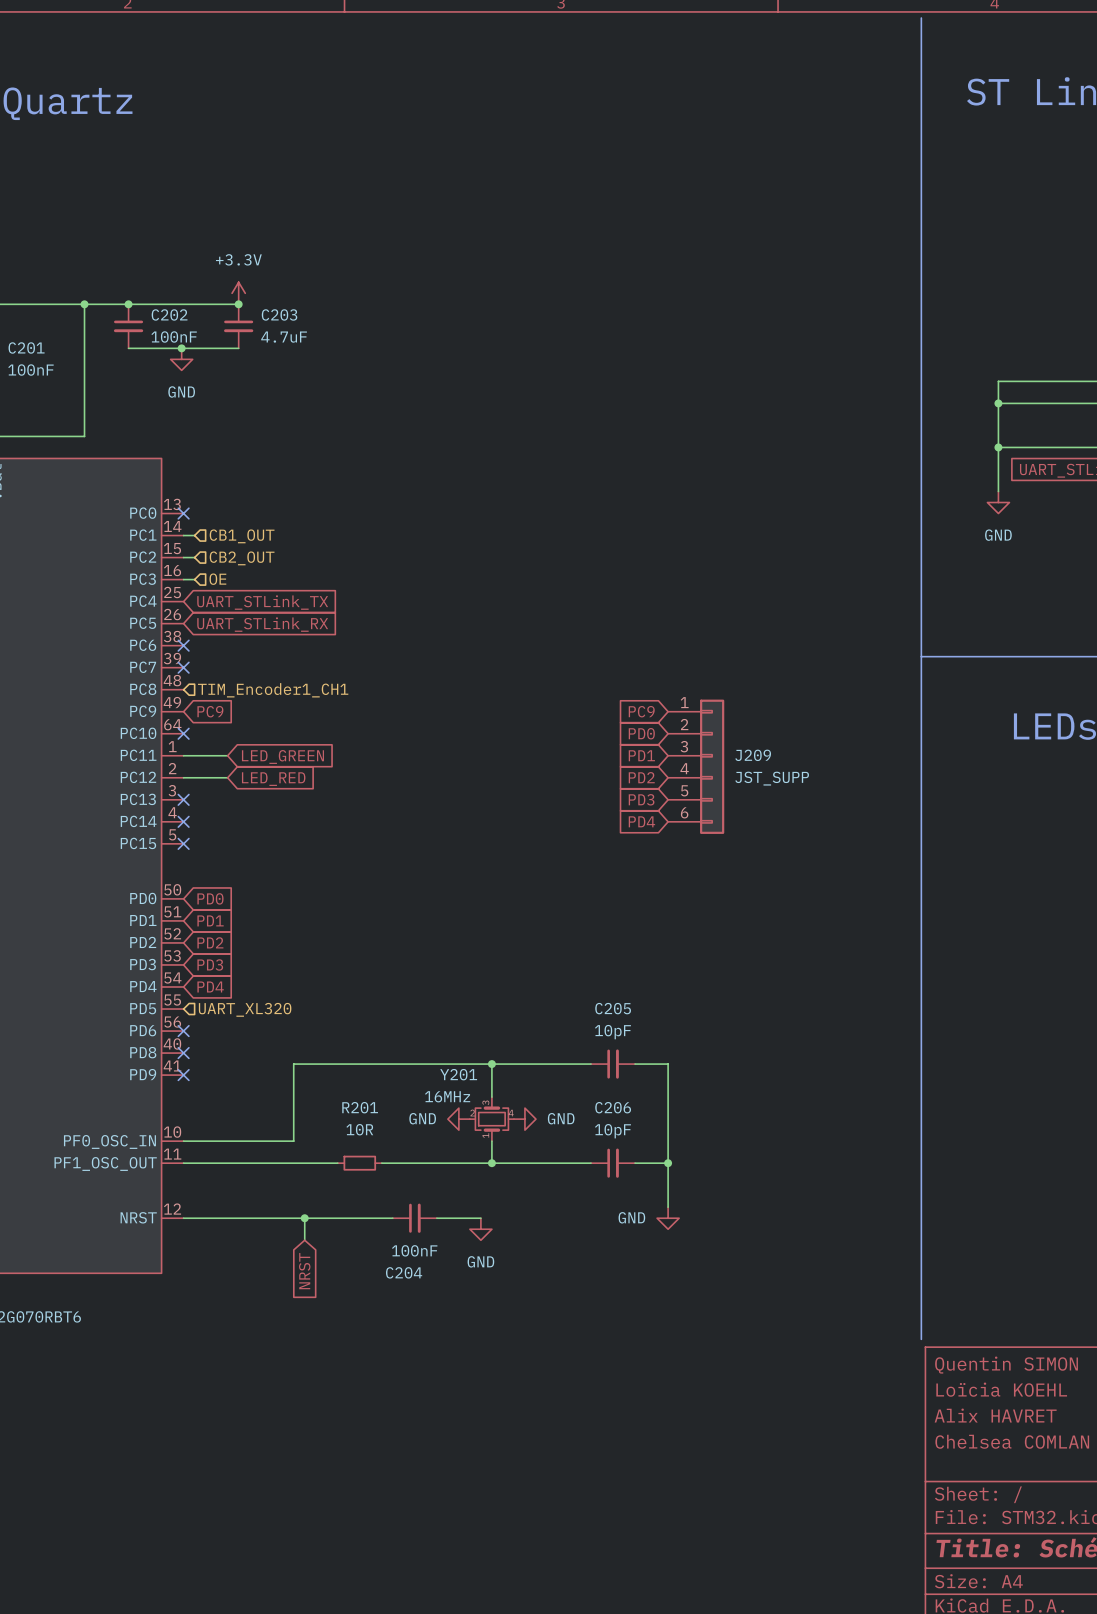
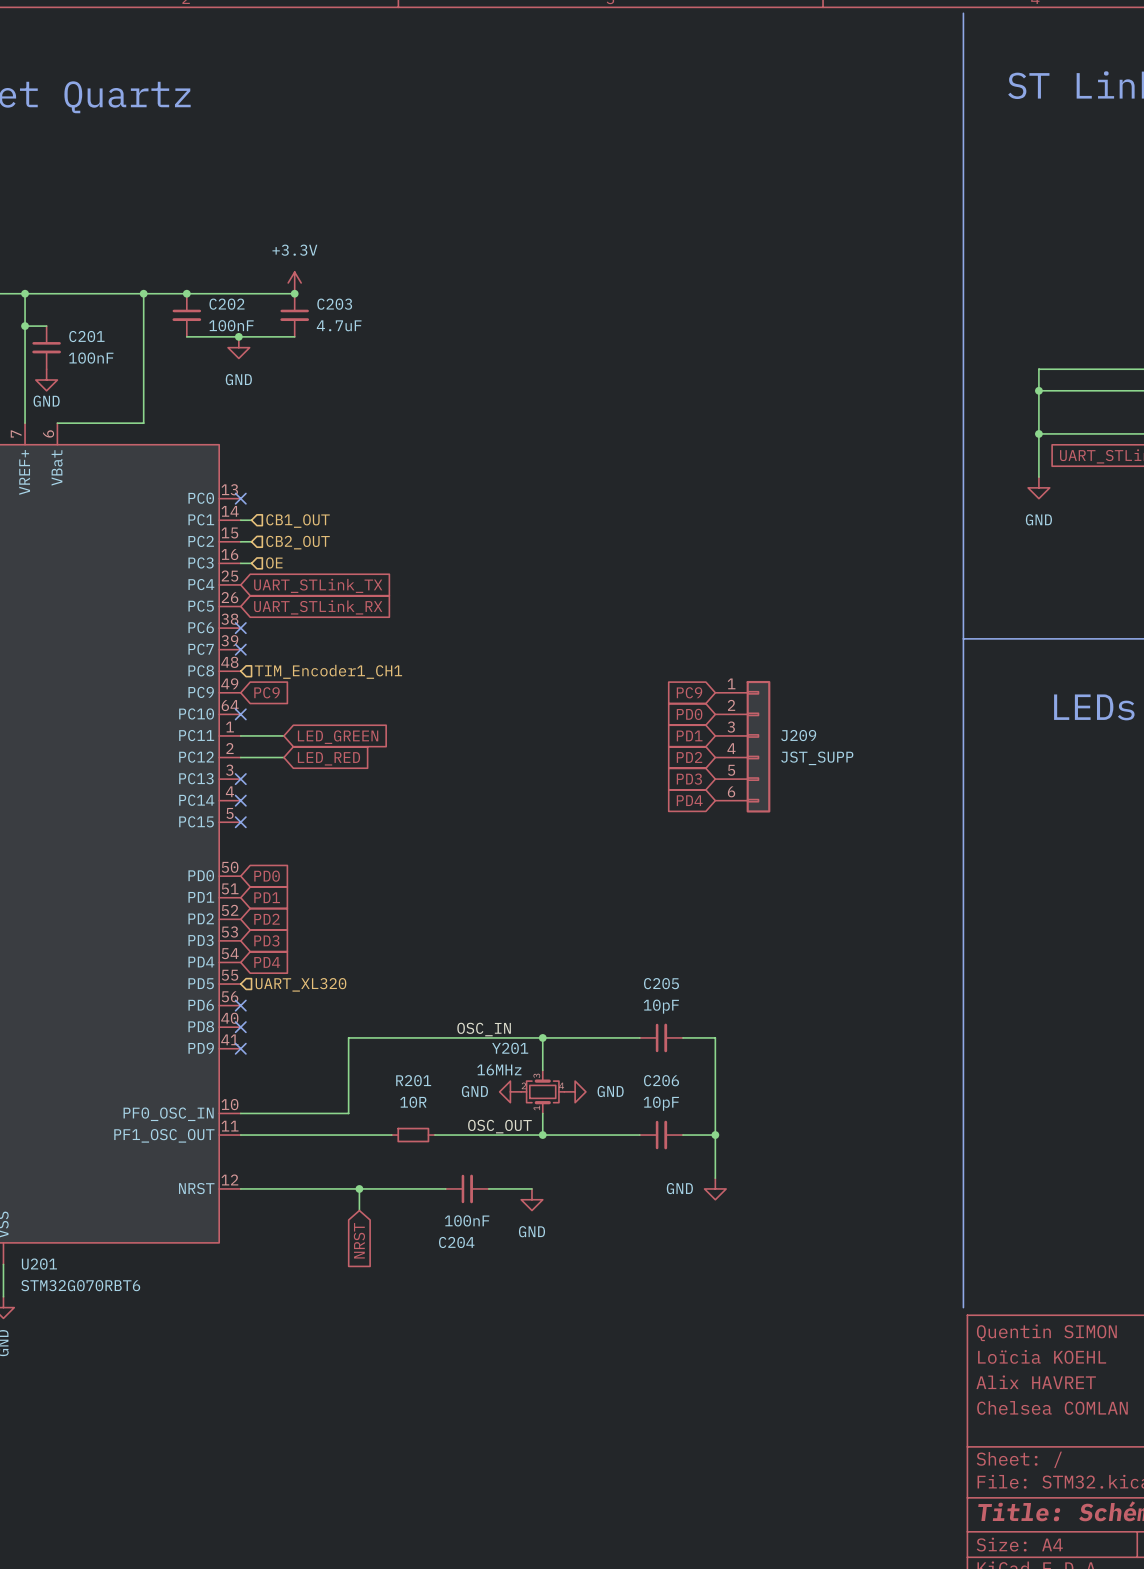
label: none -> OSC_IN (484, 1029)
label: none -> OSC_OUT (499, 1126)

